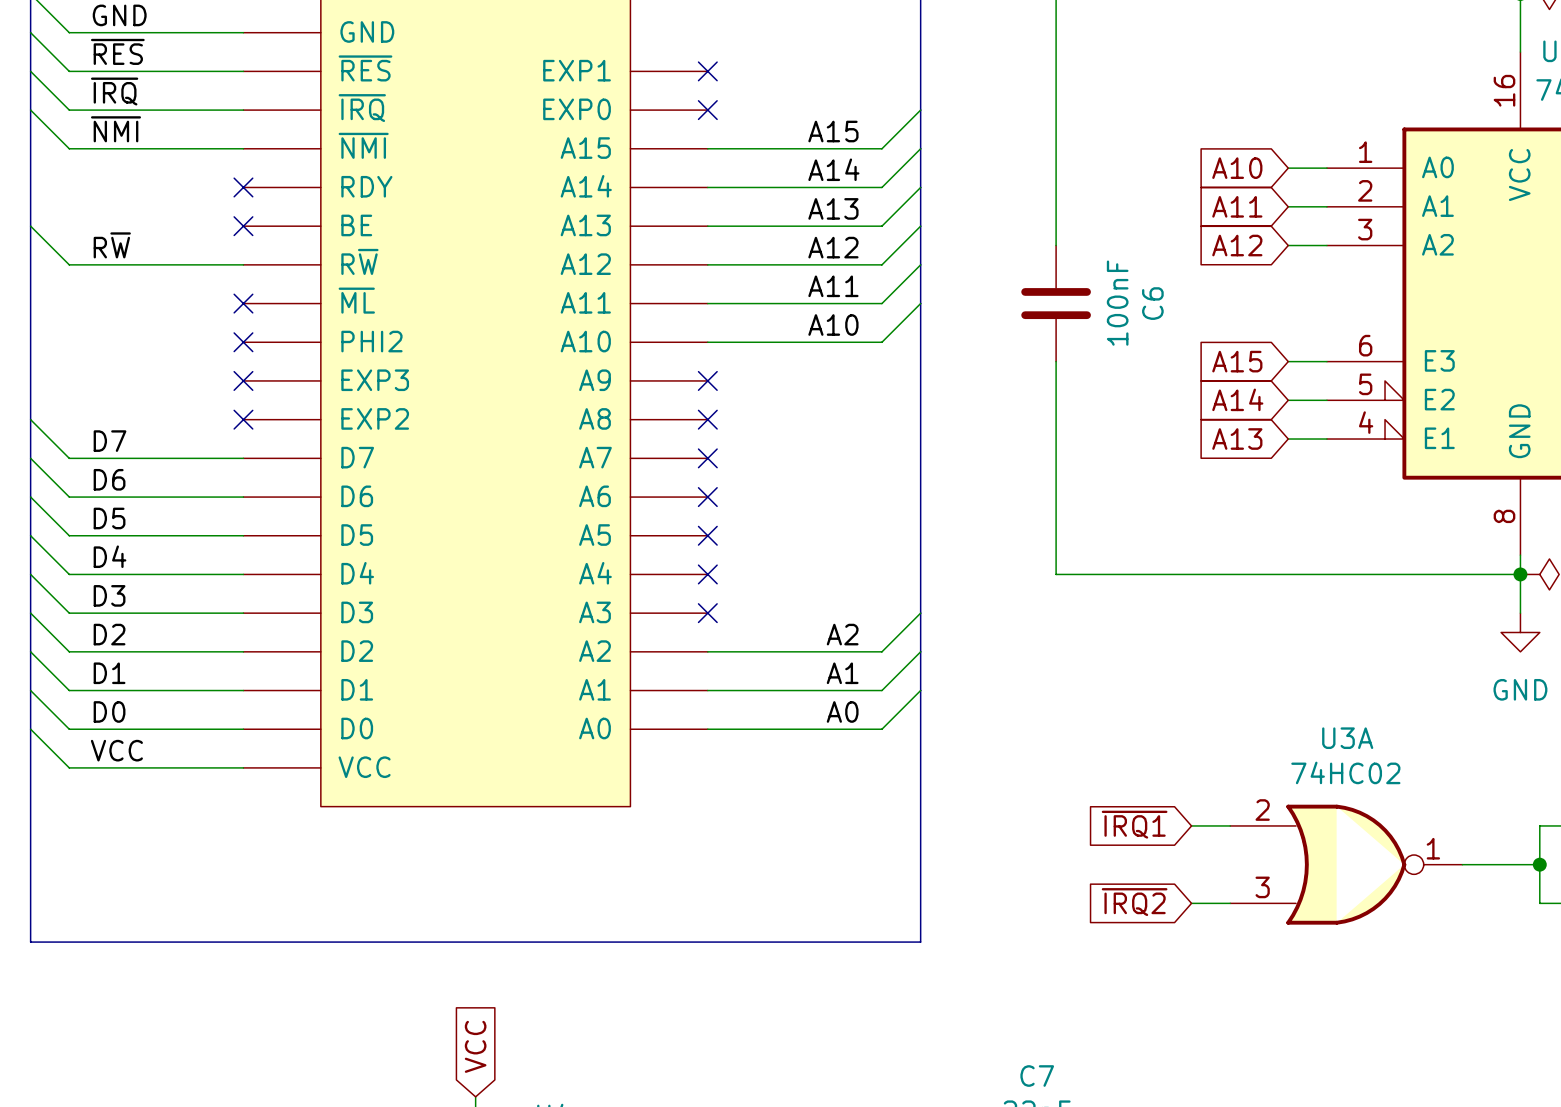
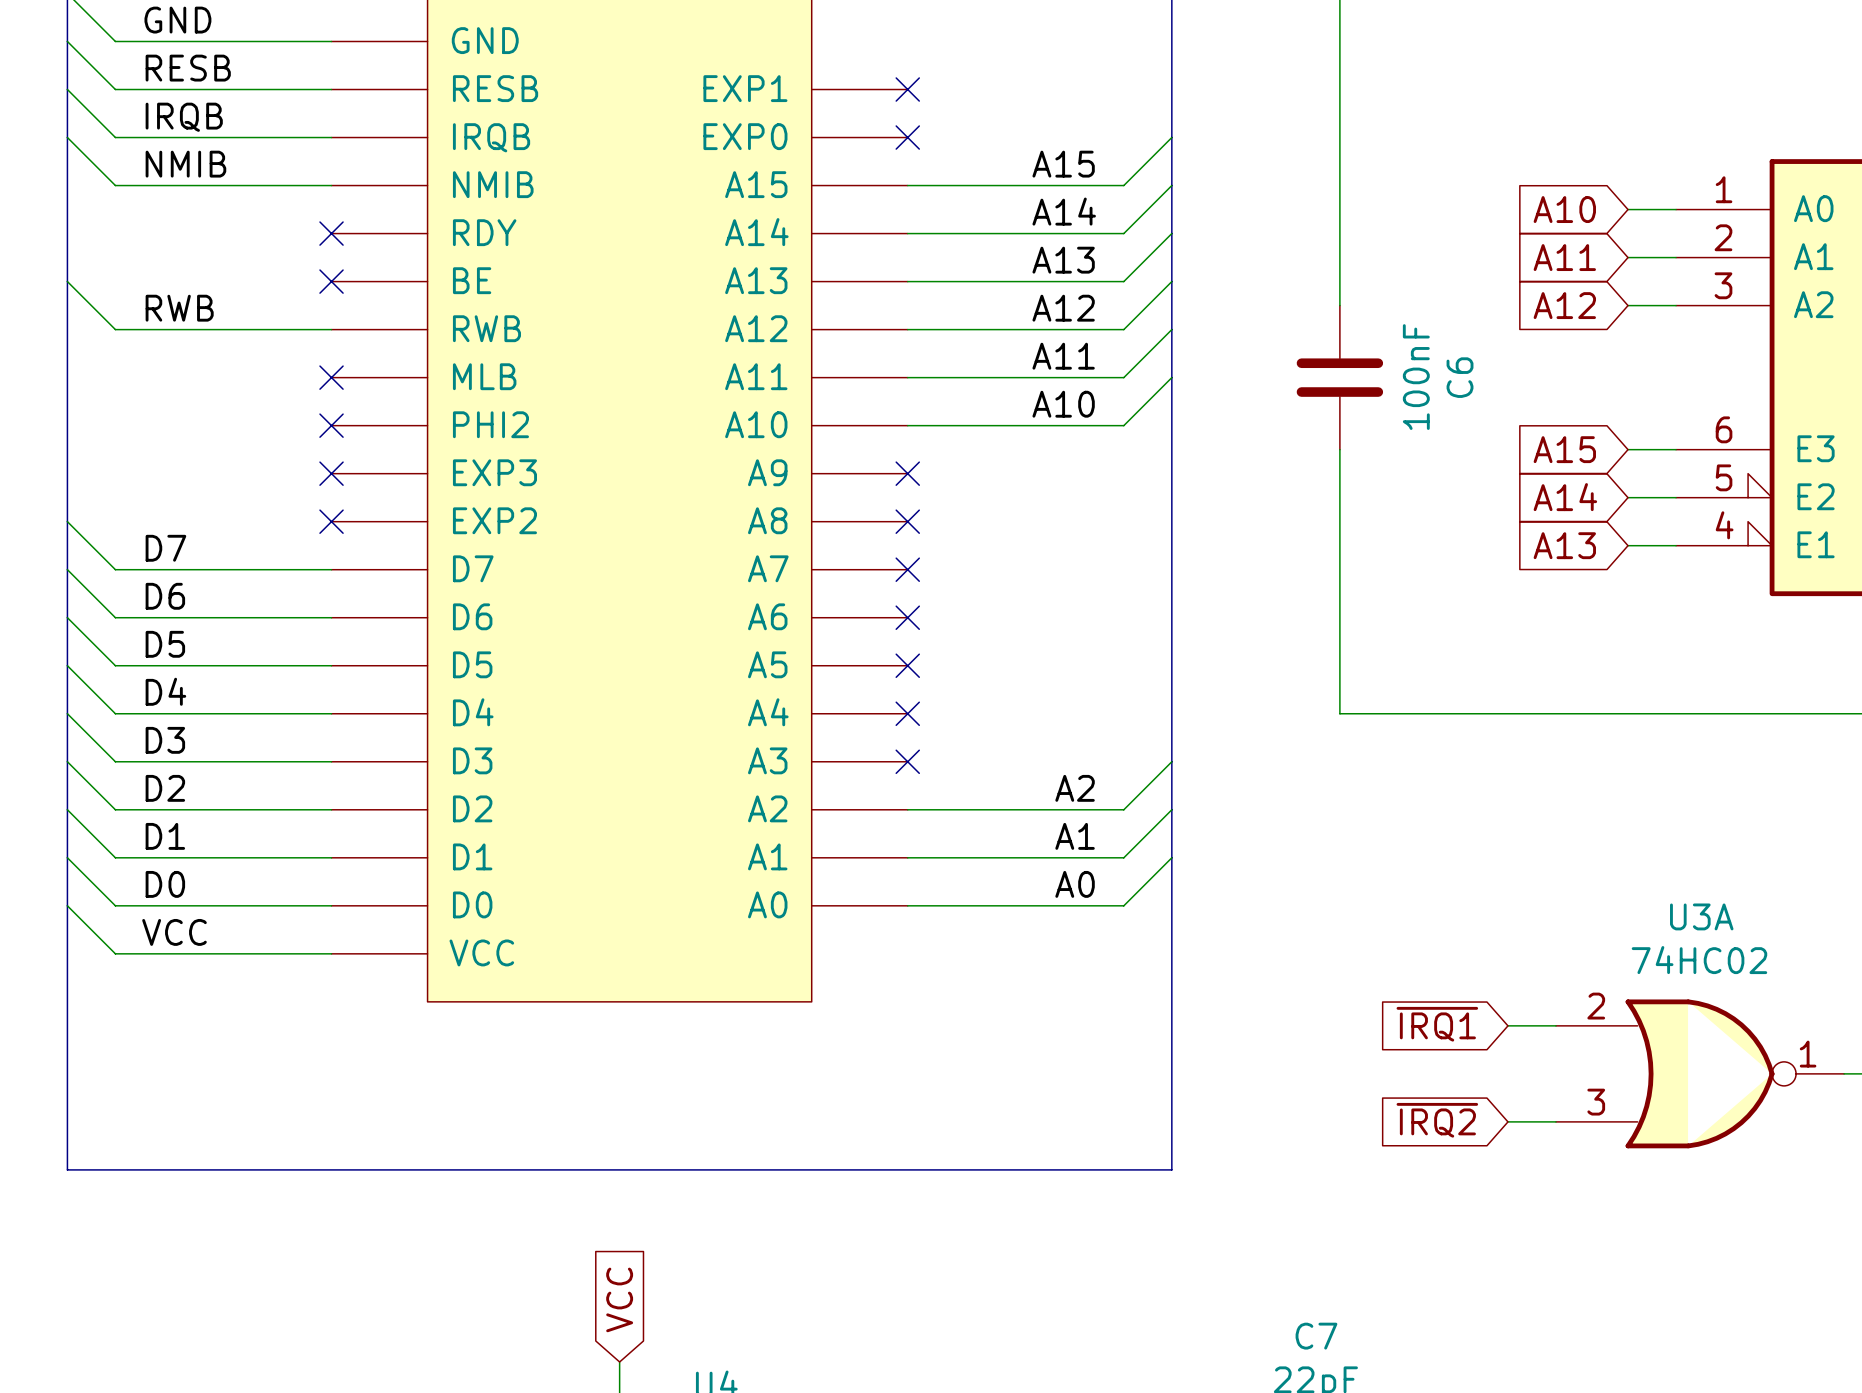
label: ~{RES} (117, 51) -> RESB (188, 68)
part pin name: ~{RES} (365, 68) -> RESB (495, 88)
label: ~{IRQ} (114, 91) -> IRQB (184, 117)
part pin name: ~{IRQ} (362, 108) -> IRQB (491, 137)
label: ~{NMI} (115, 129) -> NMIB (185, 164)
part pin name: ~{NMI} (363, 145) -> NMIB (493, 184)
label: R~{W} (112, 245) -> RWB (179, 308)
part pin name: R~{W} (359, 261) -> RWB (486, 328)
part pin name: ~{ML} (356, 300) -> MLB (484, 376)

